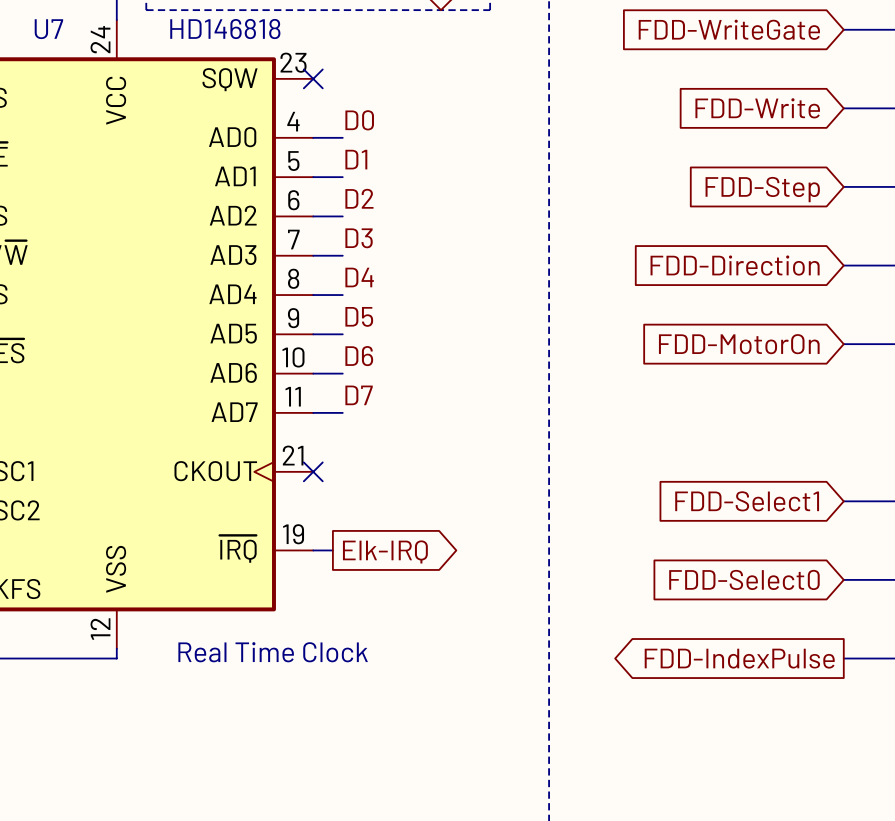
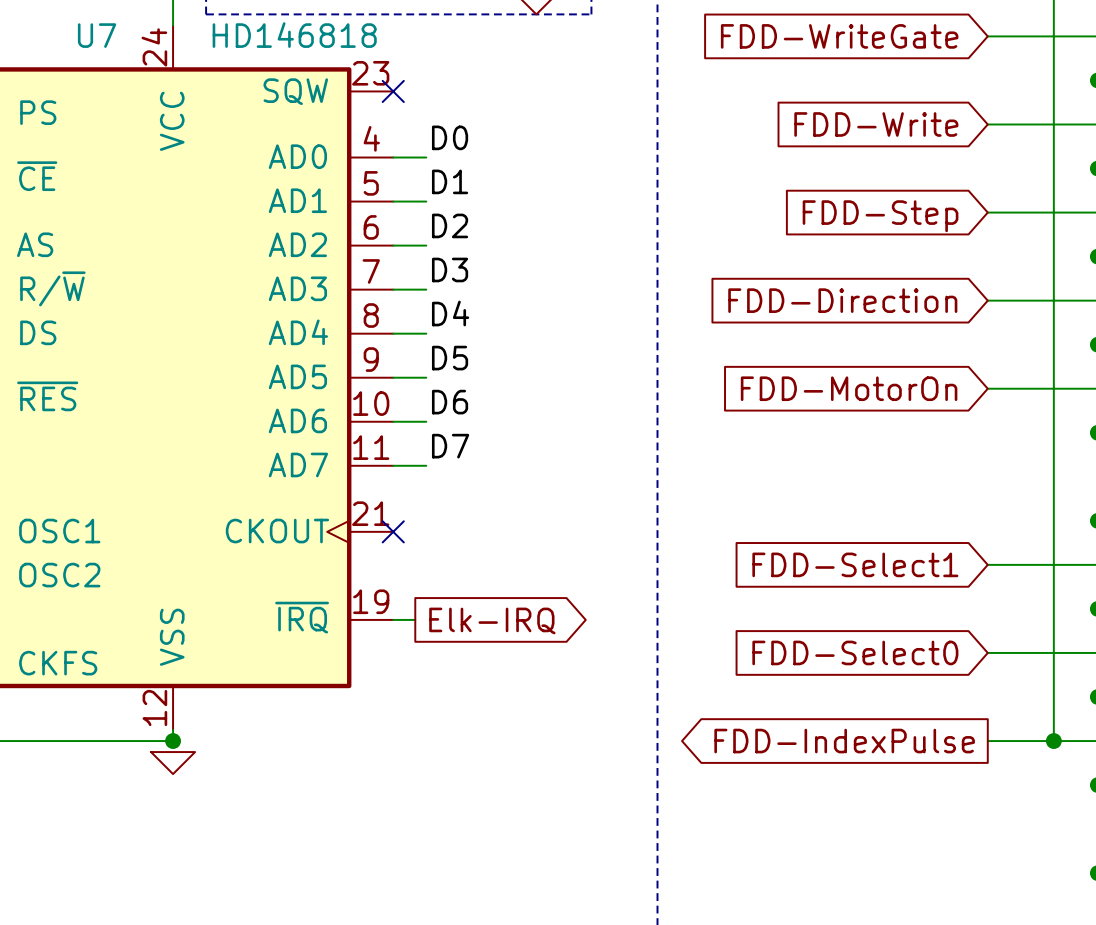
text: Real Time Clock (273, 652) -> none
junction: none -> (173, 741)
power symbol: none -> (173, 763)

